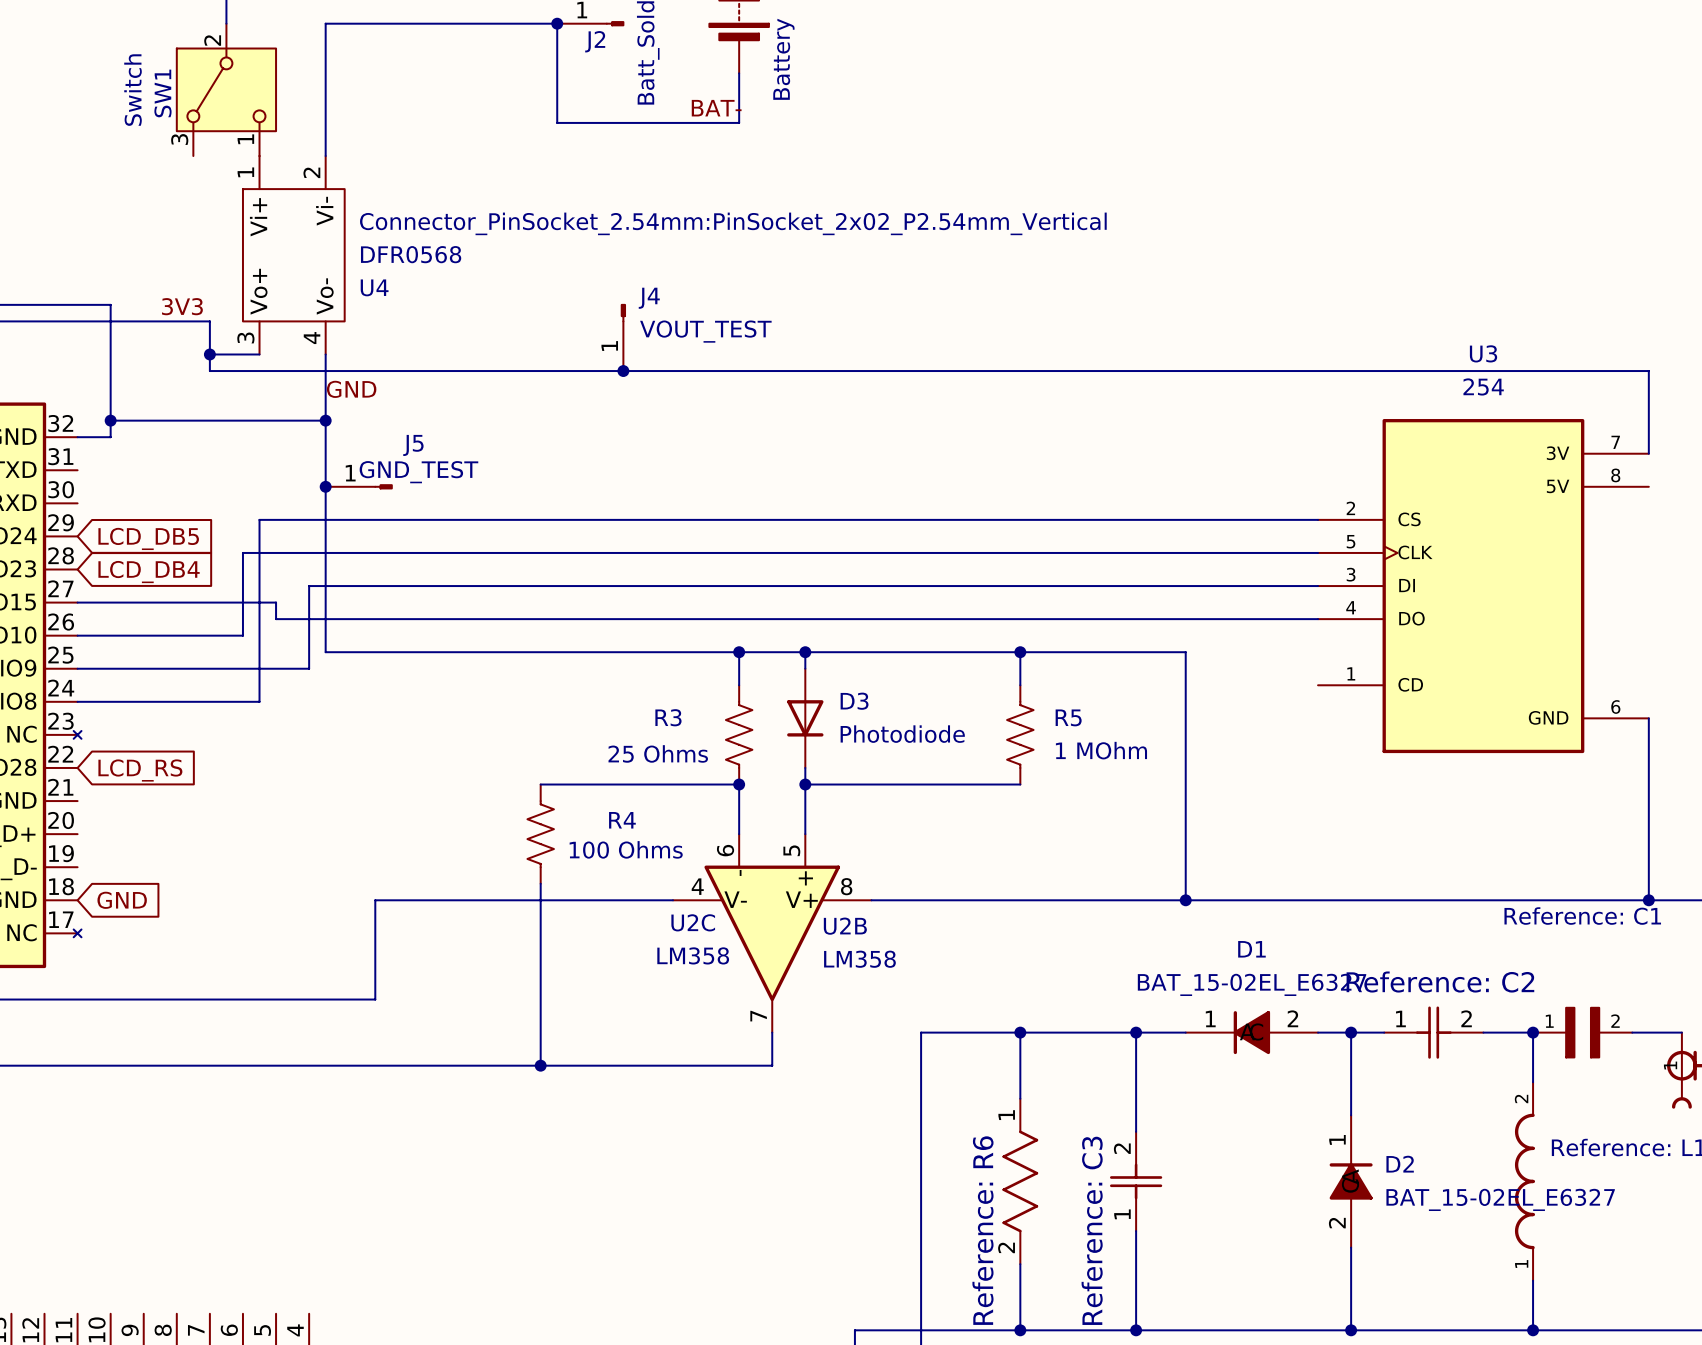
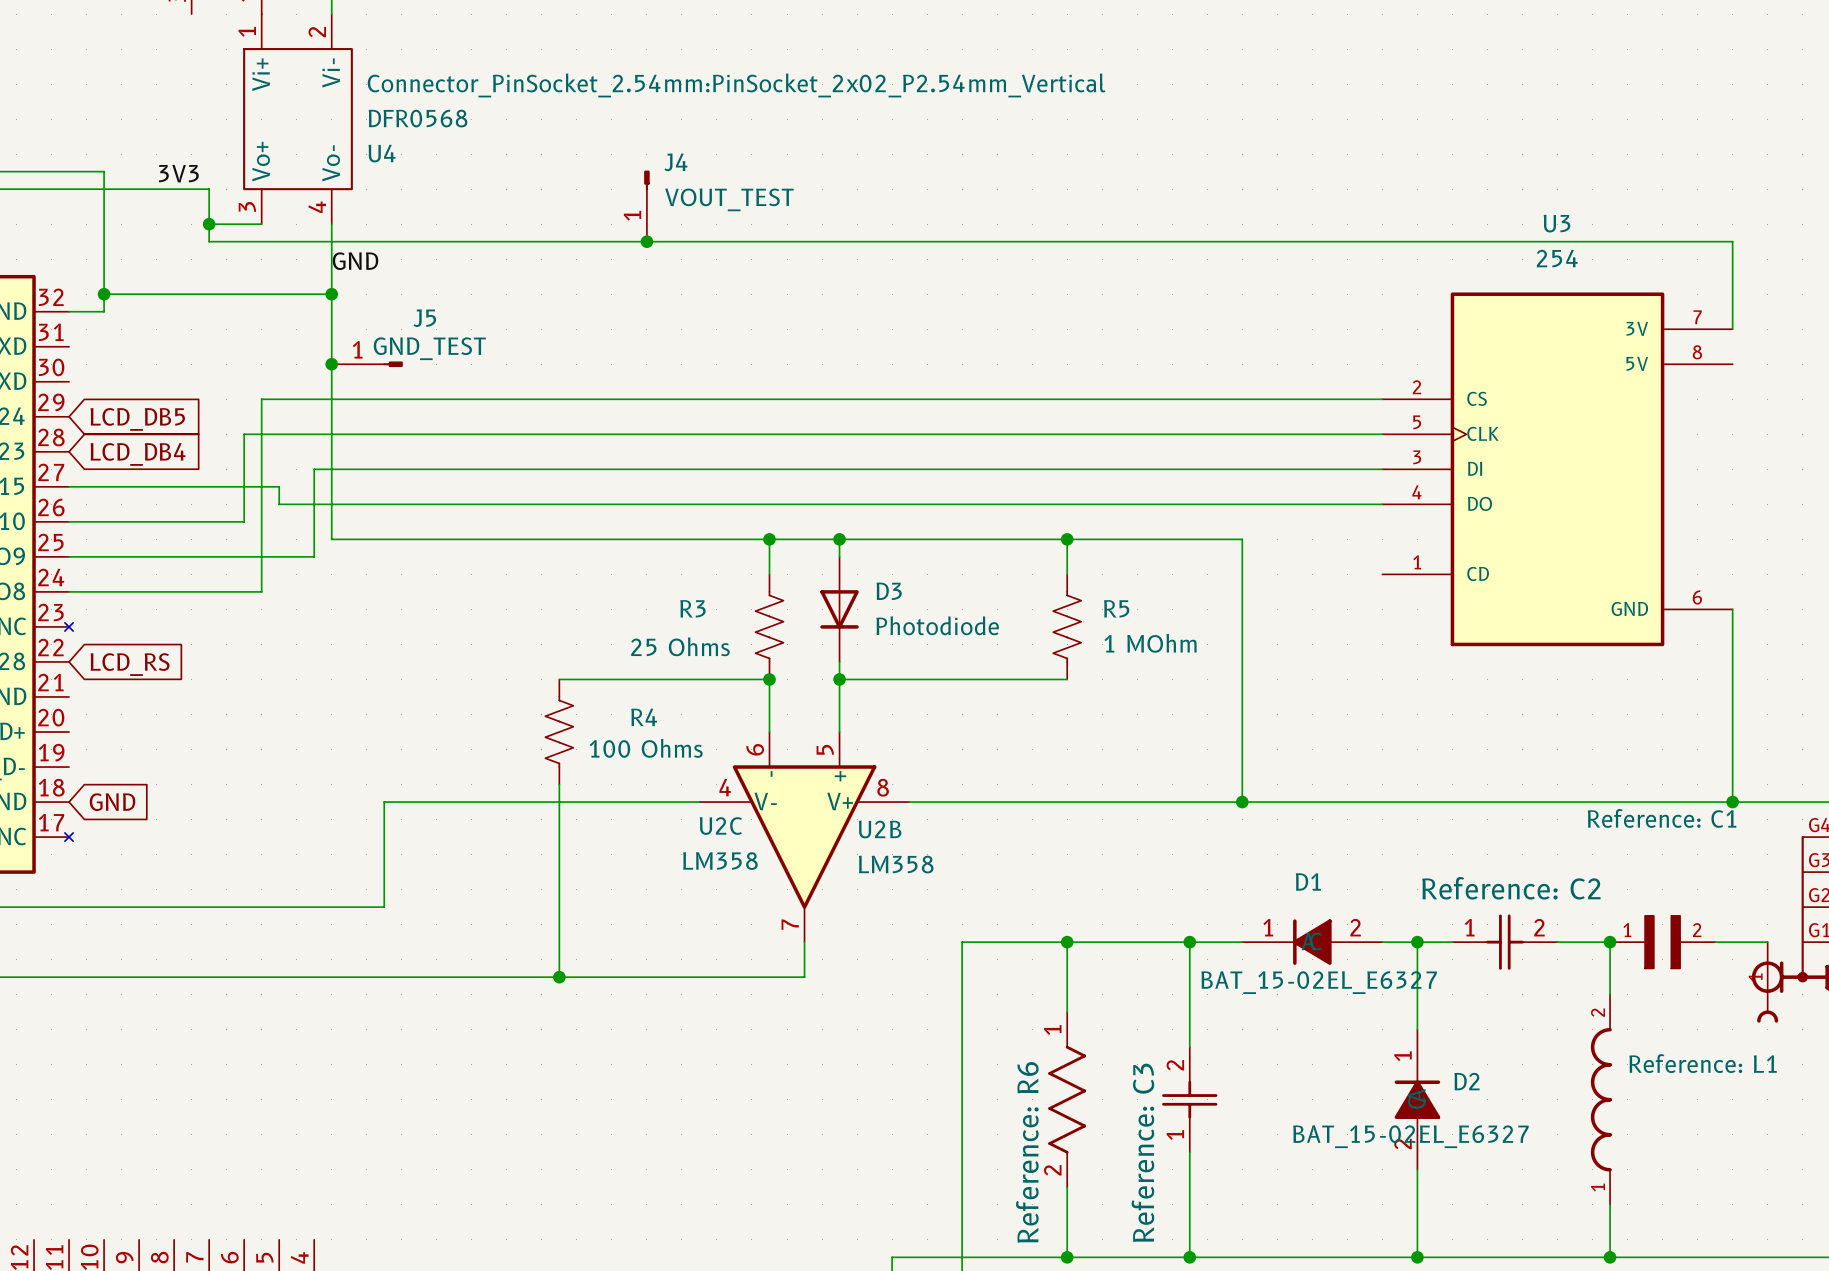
D1 name position: D1 (1251, 949) -> D1 (1308, 881)
D1 value position: BAT_15-02EL_E6327 (1252, 984) -> BAT_15-02EL_E6327 (1319, 982)
D2 value position: BAT_15-02EL_E6327 (1500, 1199) -> BAT_15-02EL_E6327 (1410, 1136)

